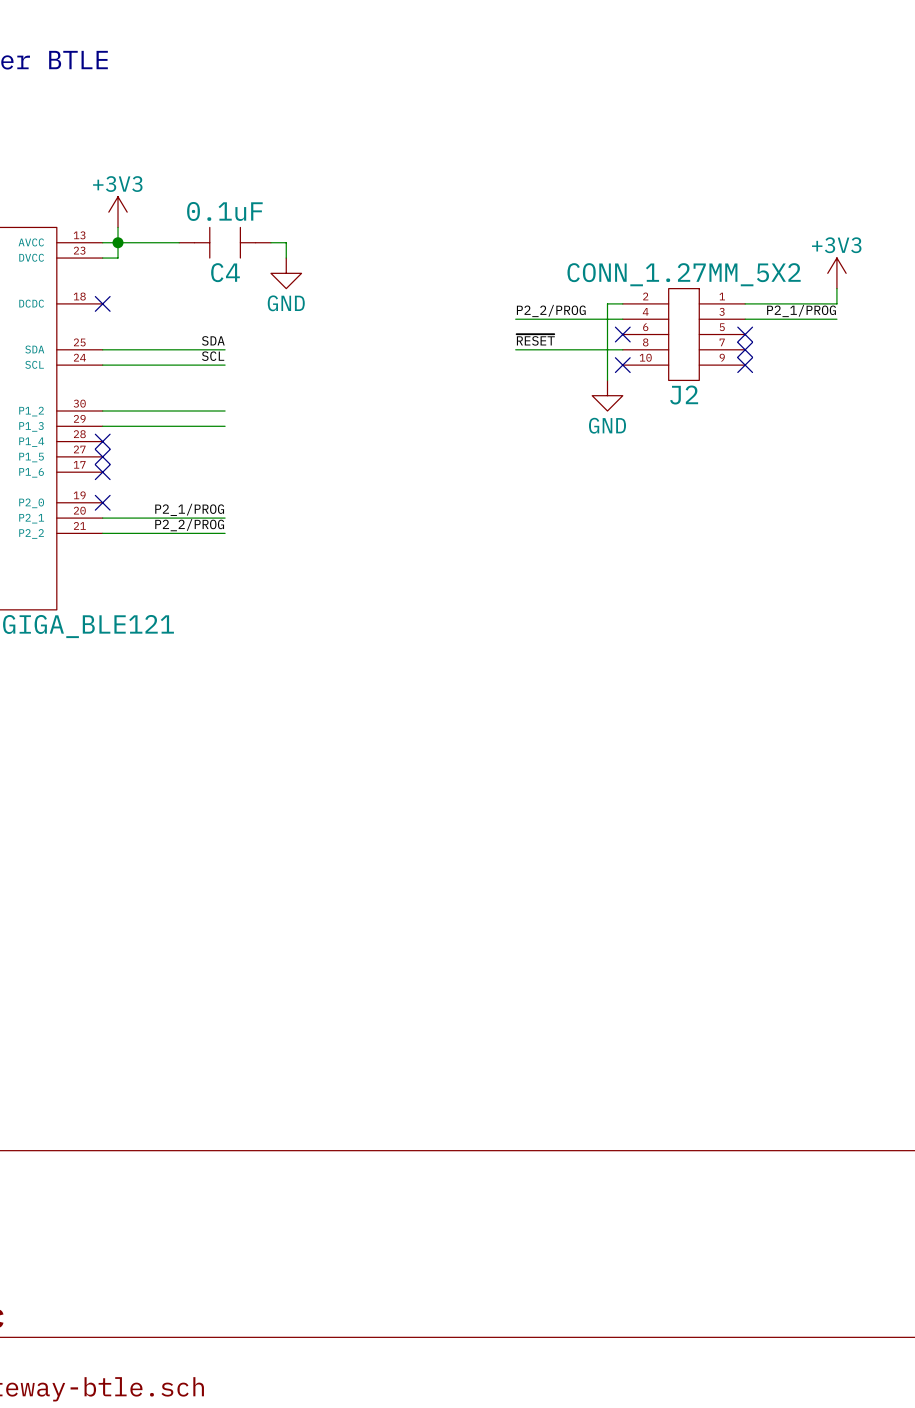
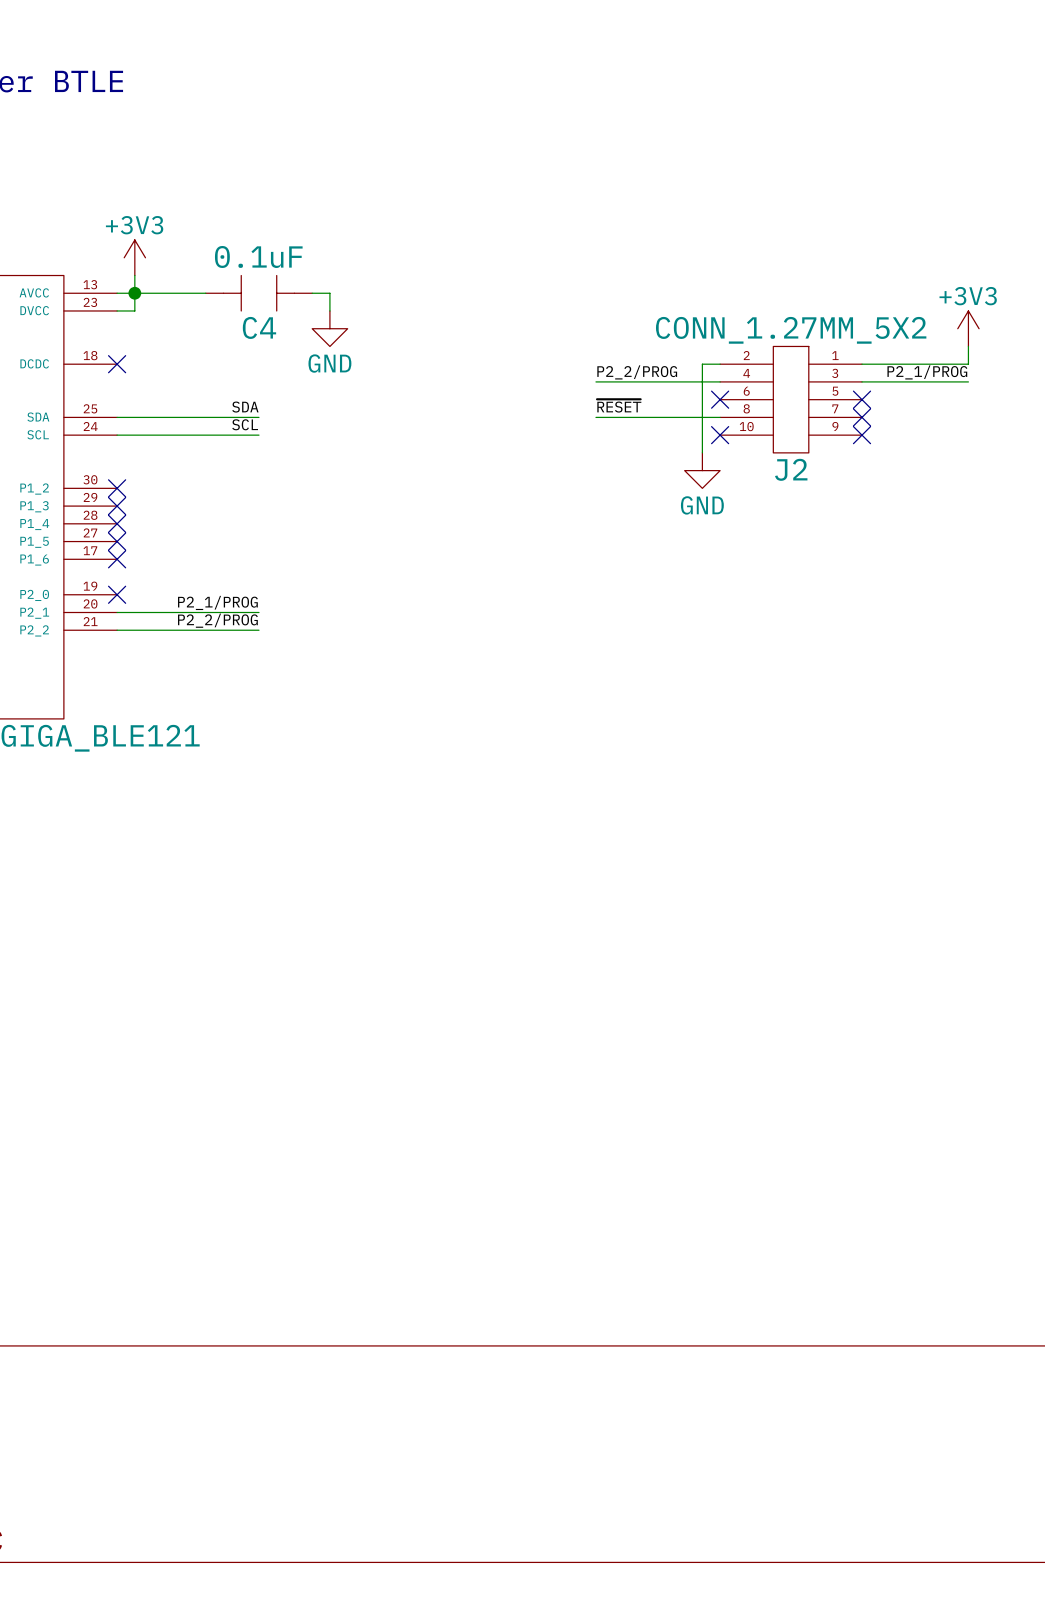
wire: (102, 411) (225, 411) -> none
no-connect mark: none -> (117, 488)
wire: (102, 426) (225, 426) -> none
no-connect mark: none -> (117, 506)

